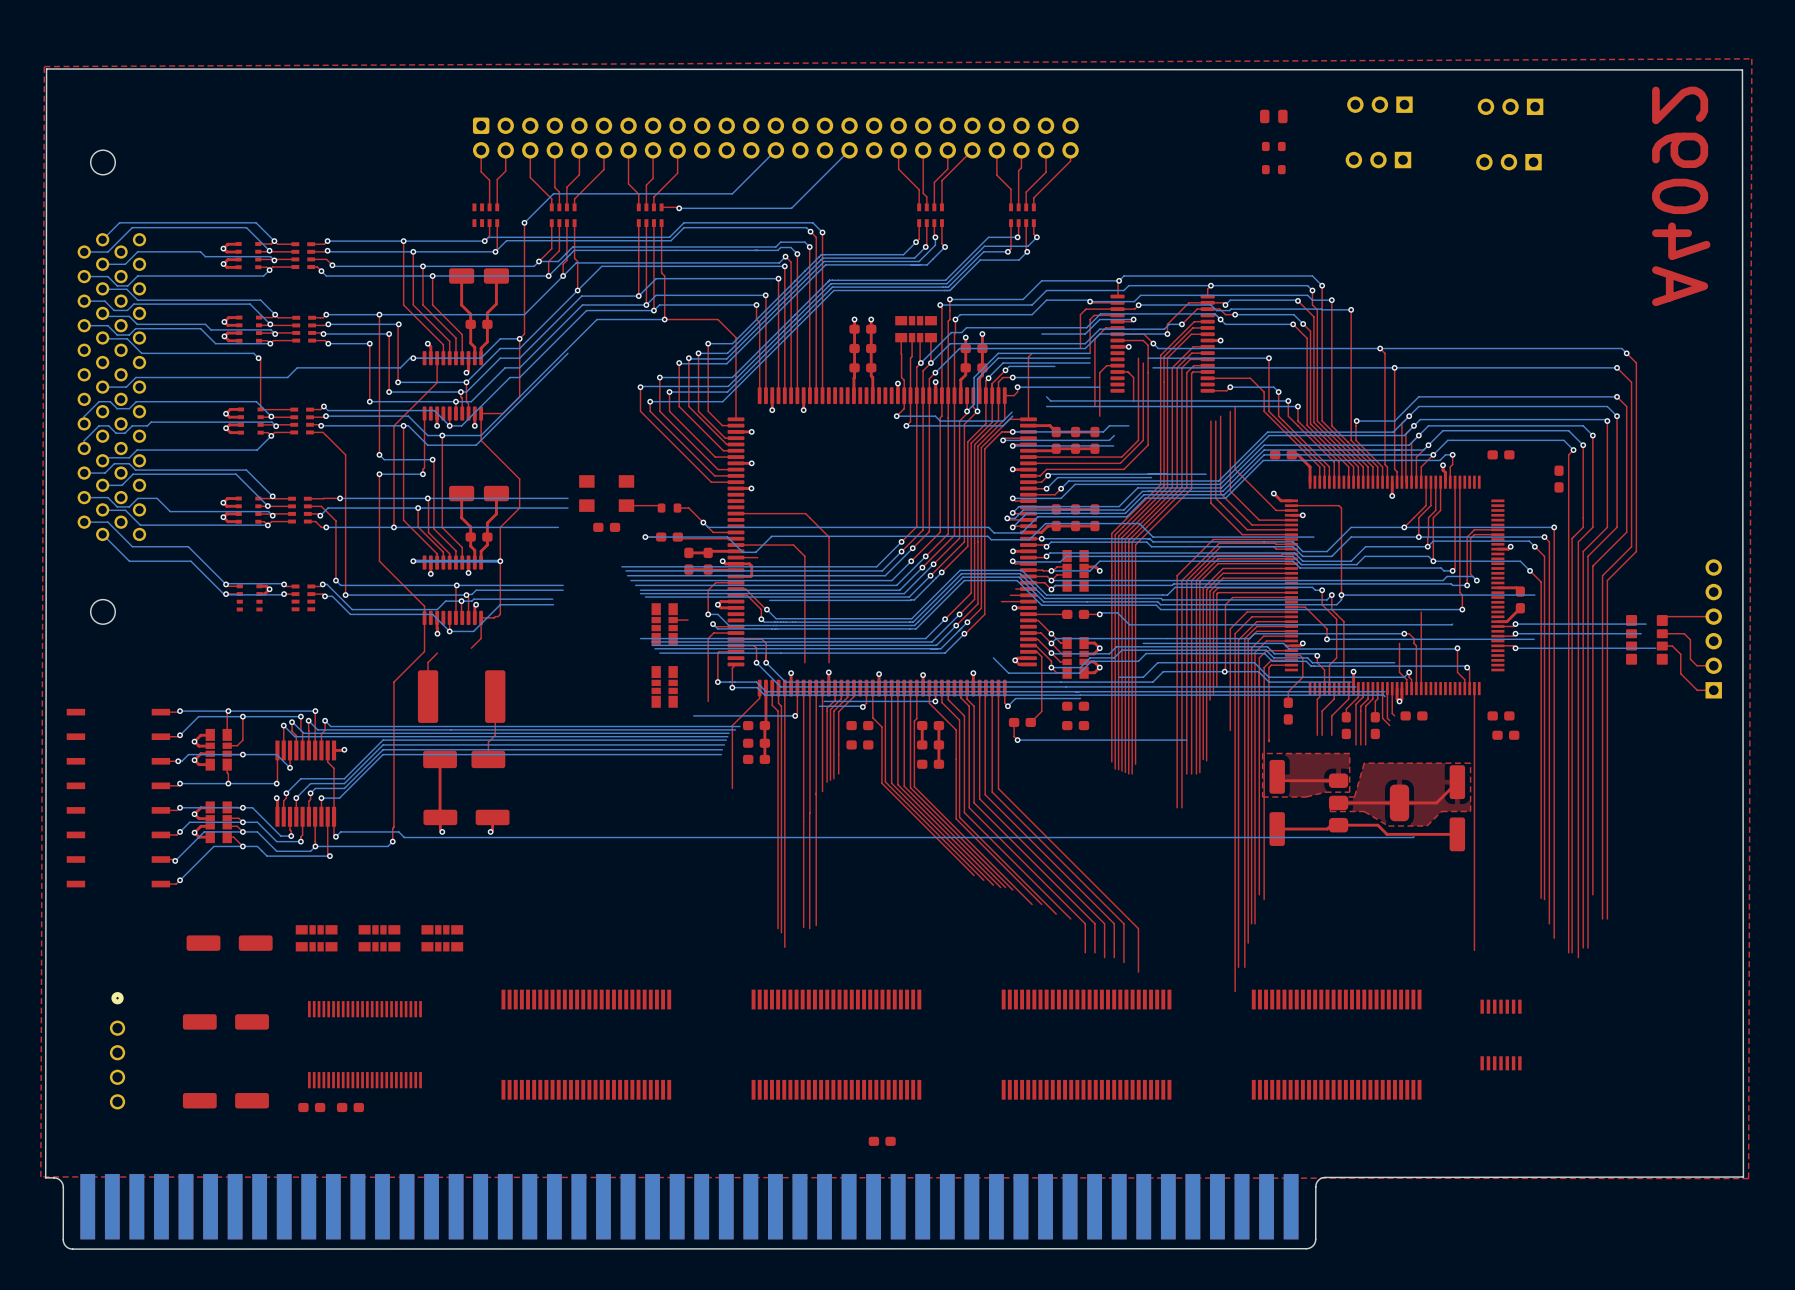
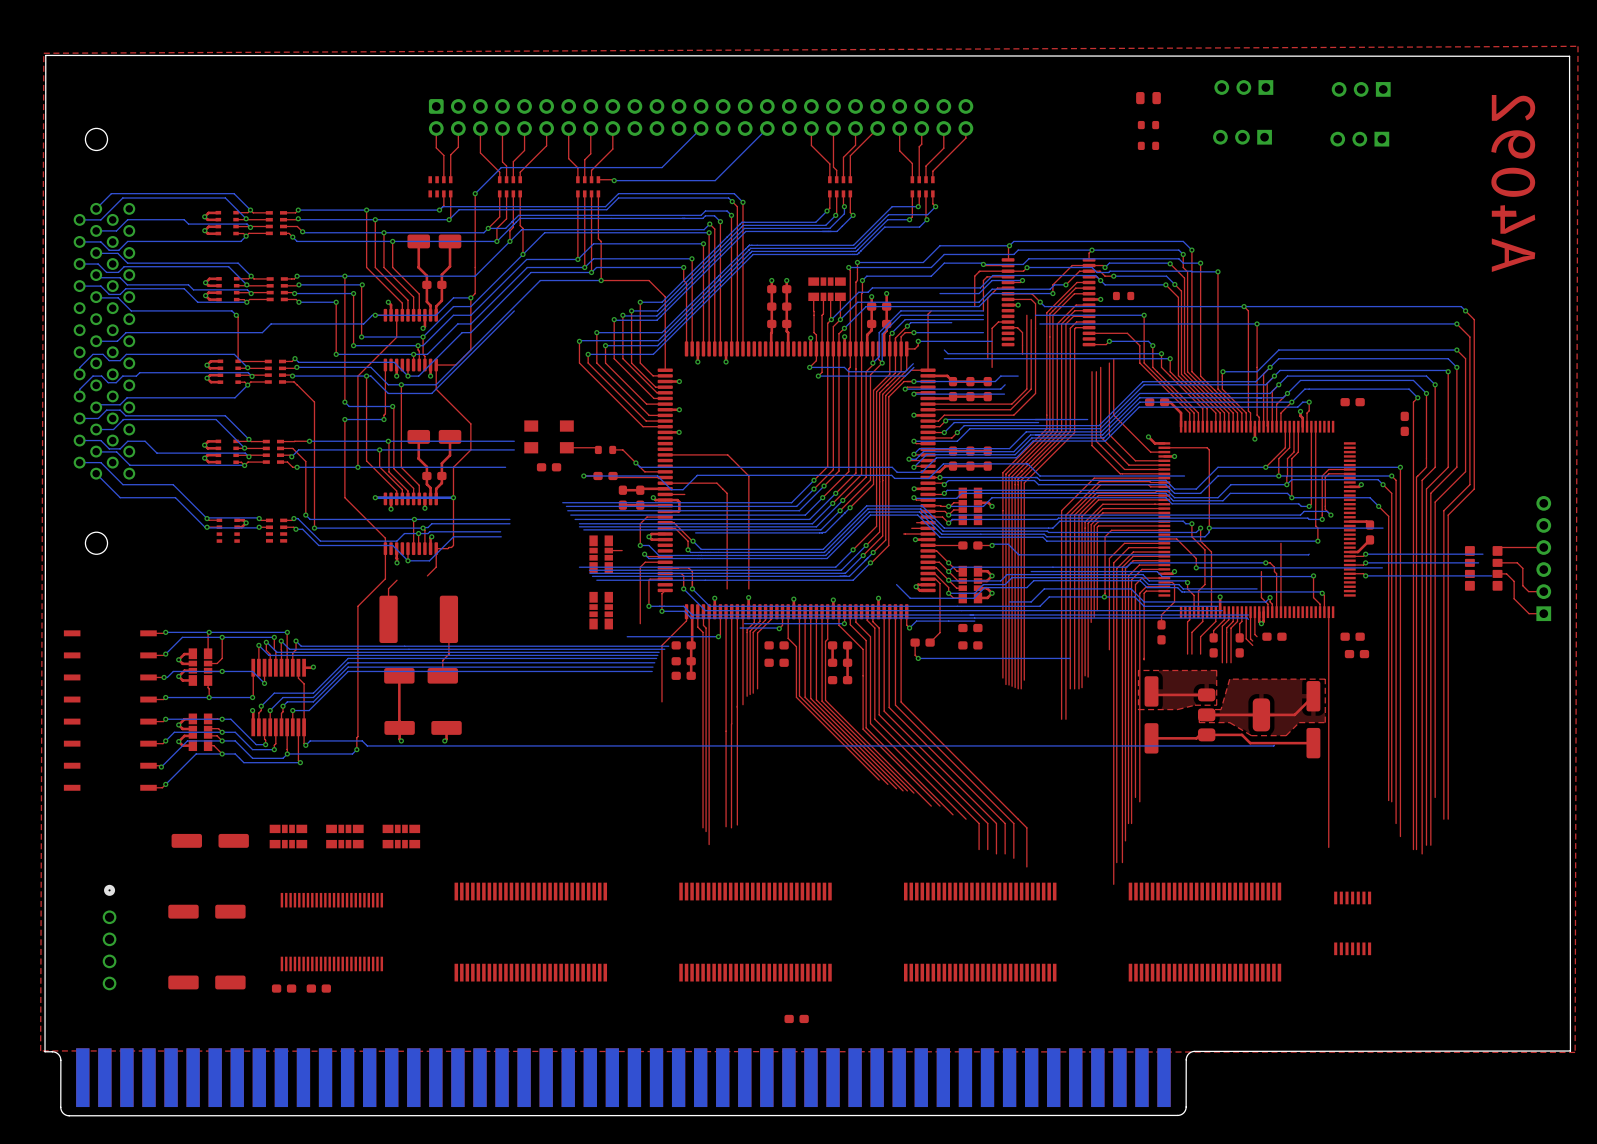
part: none -> (1123, 295)

